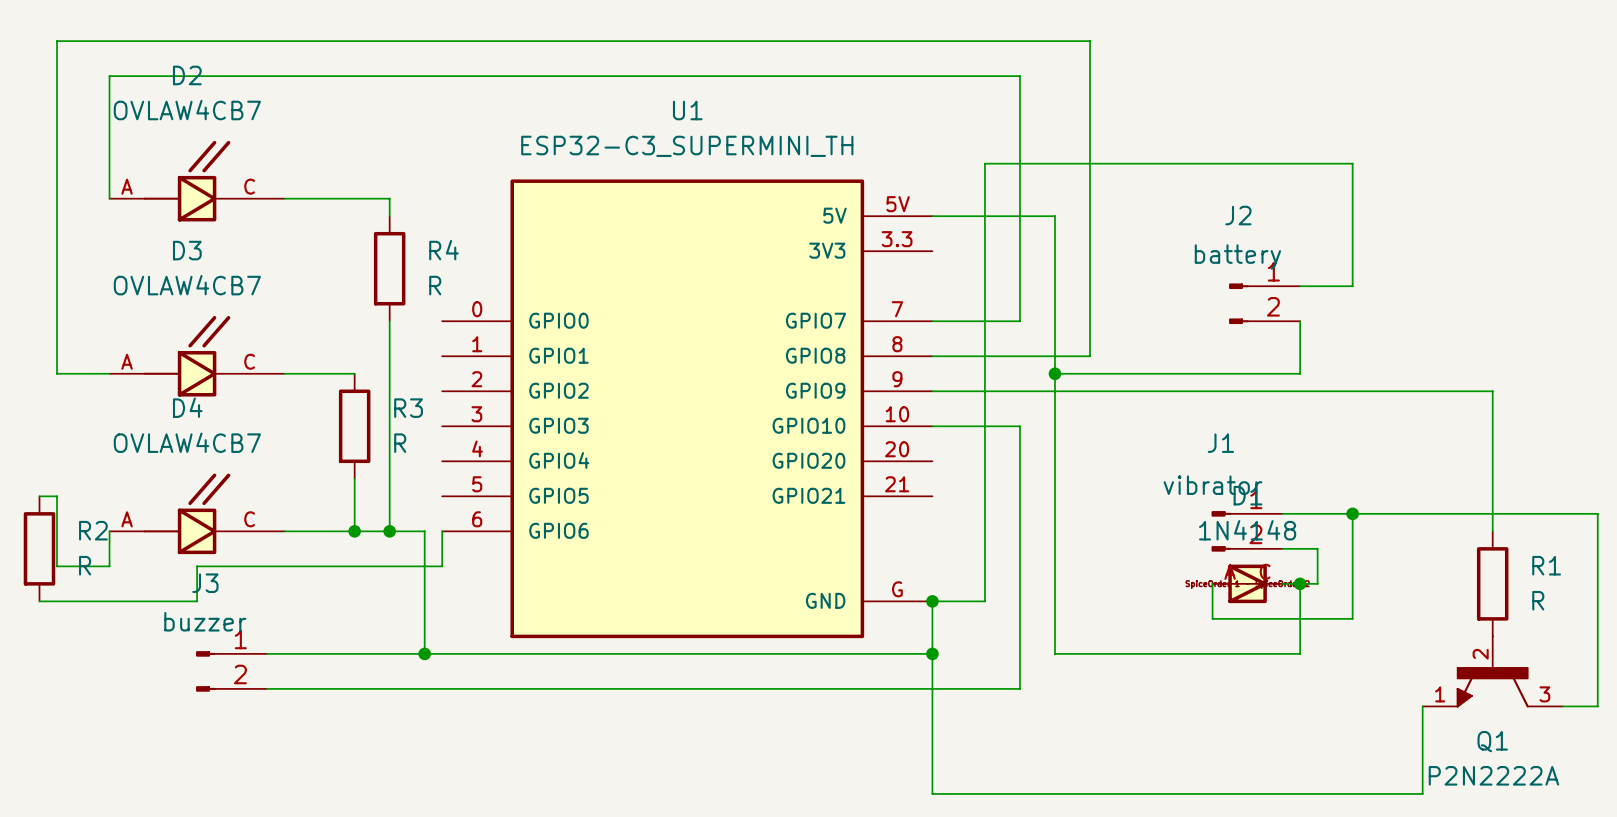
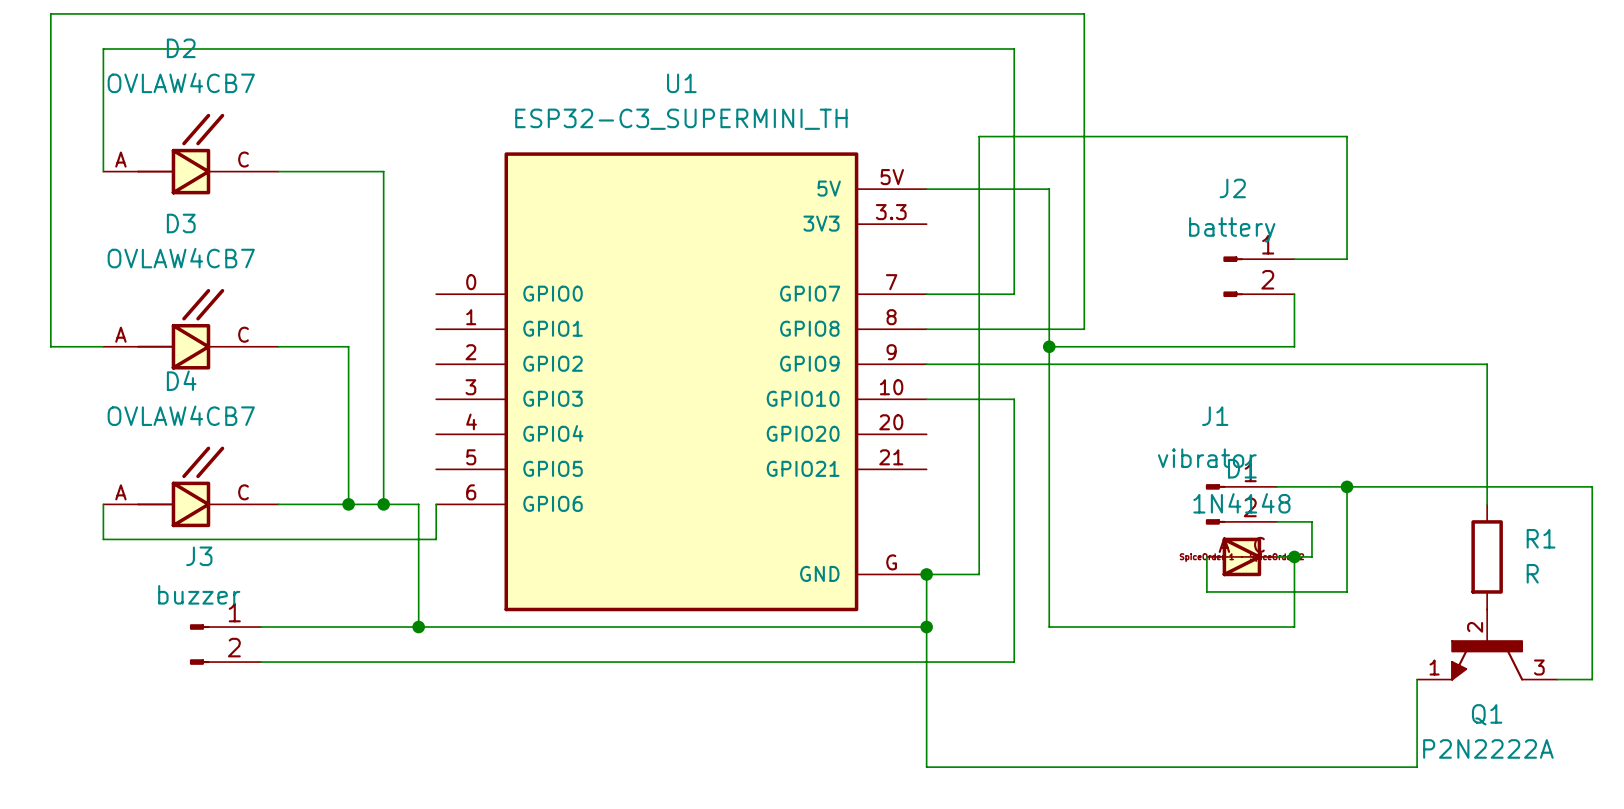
wire: none -> (383, 189) (383, 294)
R4: R (389, 268) -> none
wire: none -> (348, 346) (348, 451)
R3: R (354, 426) -> none
wire: (39, 496) (57, 496) (57, 566) (109, 566) -> none
R2: R (39, 548) -> none
wire: (197, 566) (197, 601) (39, 601) -> (190, 539) (103, 539)

